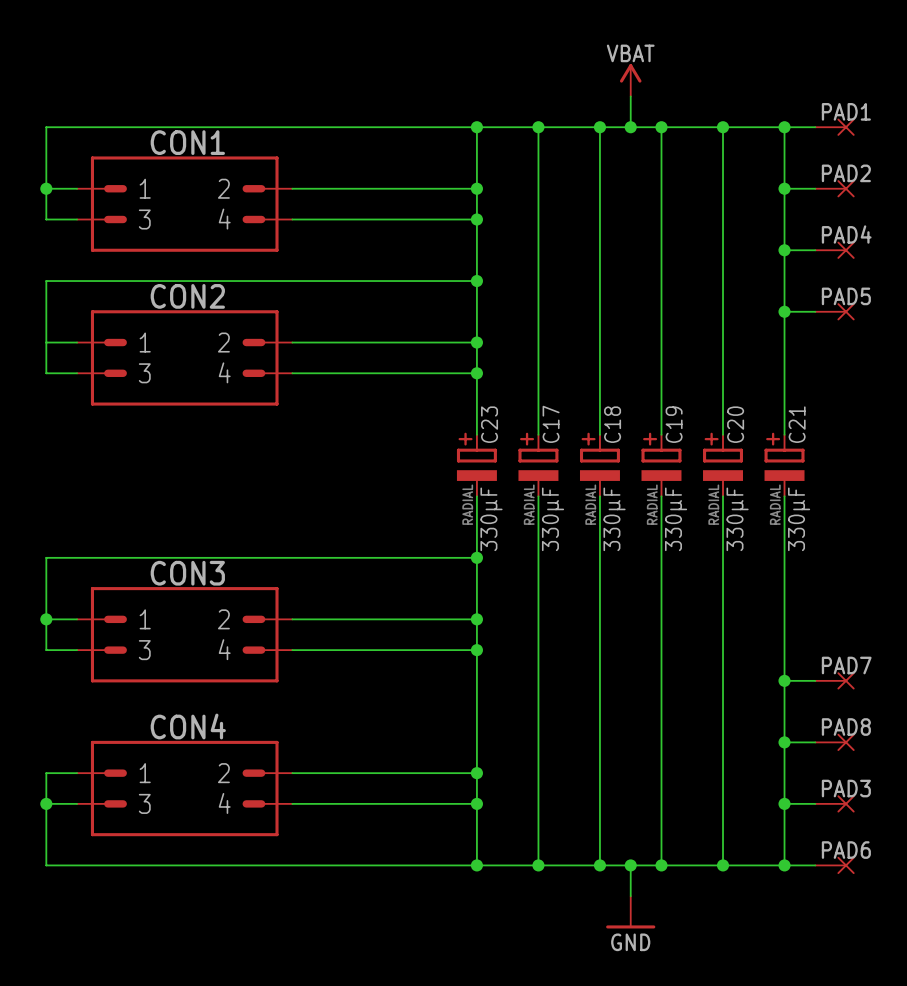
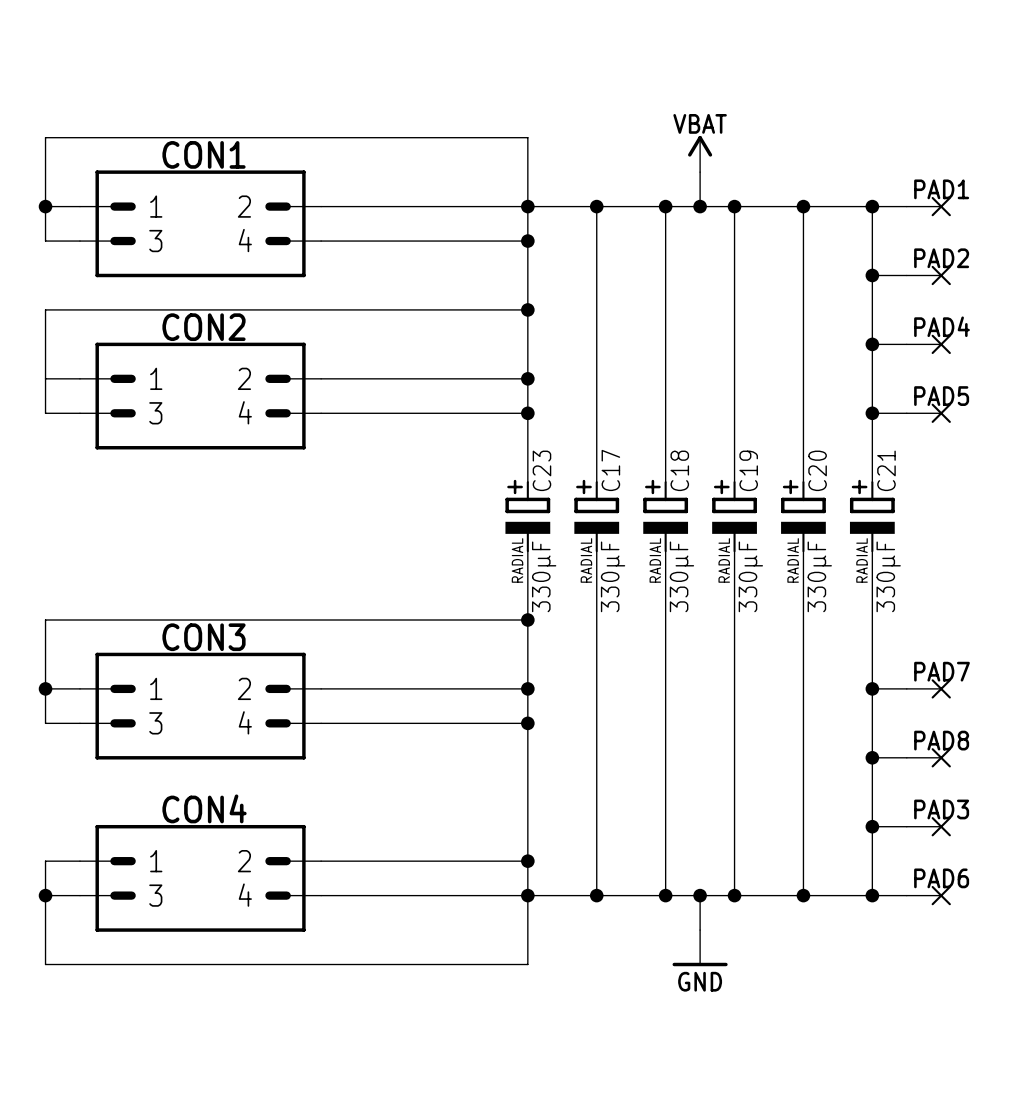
power symbol position: VBAT (630, 80) -> VBAT (700, 154)
wire: (630, 96) (630, 127) -> (700, 172) (700, 206)
wire: (476, 127) (815, 127) -> none
junction: (476, 127) -> none
wire: (538, 127) (538, 188) -> none
junction: (538, 127) -> none
wire: (599, 127) (599, 188) -> none
junction: (599, 127) -> none
junction: (630, 127) -> none
wire: (661, 127) (661, 188) -> none
junction: (661, 127) -> none
wire: (723, 127) (723, 188) -> none
junction: (723, 127) -> none
wire: (784, 127) (784, 188) -> (527, 206) (872, 206)
junction: (784, 127) -> none
PAD1: (834, 127) -> none
PAD2 name: PAD2 (846, 173) -> PAD1 (941, 189)
junction: none -> (596, 206)
junction: none -> (665, 206)
junction: none -> (700, 206)
junction: none -> (734, 206)
junction: none -> (803, 206)
PAD4 name: PAD4 (846, 234) -> PAD2 (941, 258)
PAD5 name: PAD5 (846, 296) -> PAD4 (941, 326)
wire: none -> (872, 413) (906, 413)
junction: none -> (872, 413)
PAD5: none -> (928, 413)
wire: none -> (872, 688) (906, 688)
junction: none -> (872, 688)
PAD7: none -> (928, 688)
PAD7 name: PAD7 (846, 665) -> PAD8 (941, 740)
PAD8 name: PAD8 (846, 727) -> PAD3 (941, 809)
PAD3 name: PAD3 (846, 788) -> PAD6 (941, 878)
wire: (538, 803) (538, 865) -> none
junction: none -> (596, 895)
wire: (599, 803) (599, 865) -> none
junction: none -> (665, 895)
junction: none -> (700, 895)
wire: (661, 803) (661, 865) -> none
junction: none -> (734, 895)
wire: (723, 803) (723, 865) -> none
junction: none -> (803, 895)
wire: (784, 803) (784, 865) -> (872, 895) (527, 895)
wire: (476, 865) (815, 865) -> none
junction: (476, 865) -> none
junction: (538, 865) -> none
junction: (599, 865) -> none
wire: (630, 865) (630, 896) -> (700, 895) (700, 930)
junction: (630, 865) -> none
junction: (661, 865) -> none
junction: (723, 865) -> none
junction: (784, 865) -> none
PAD6: (834, 865) -> none
power symbol position: GND (630, 912) -> GND (700, 948)

